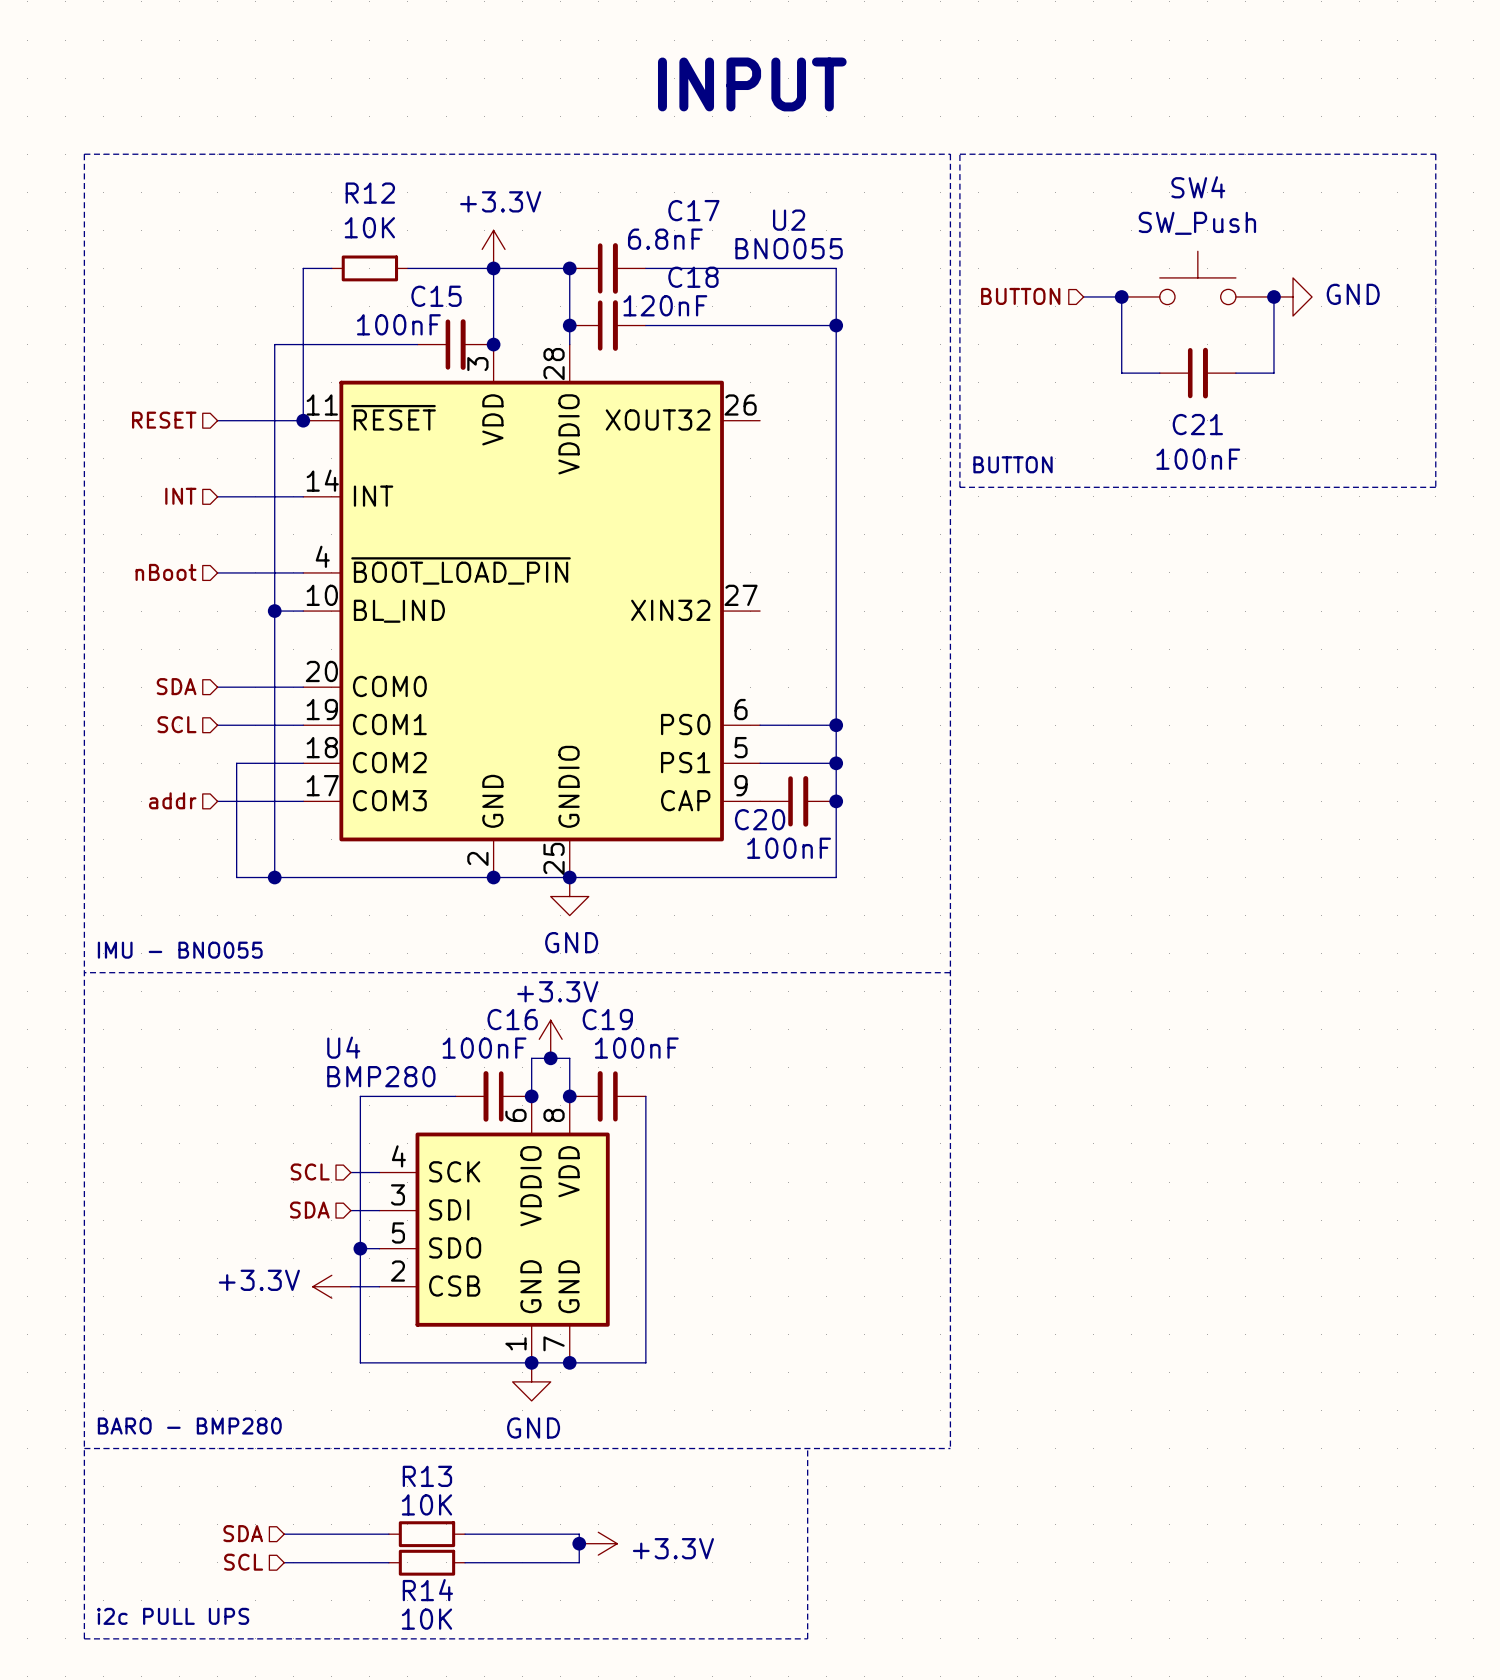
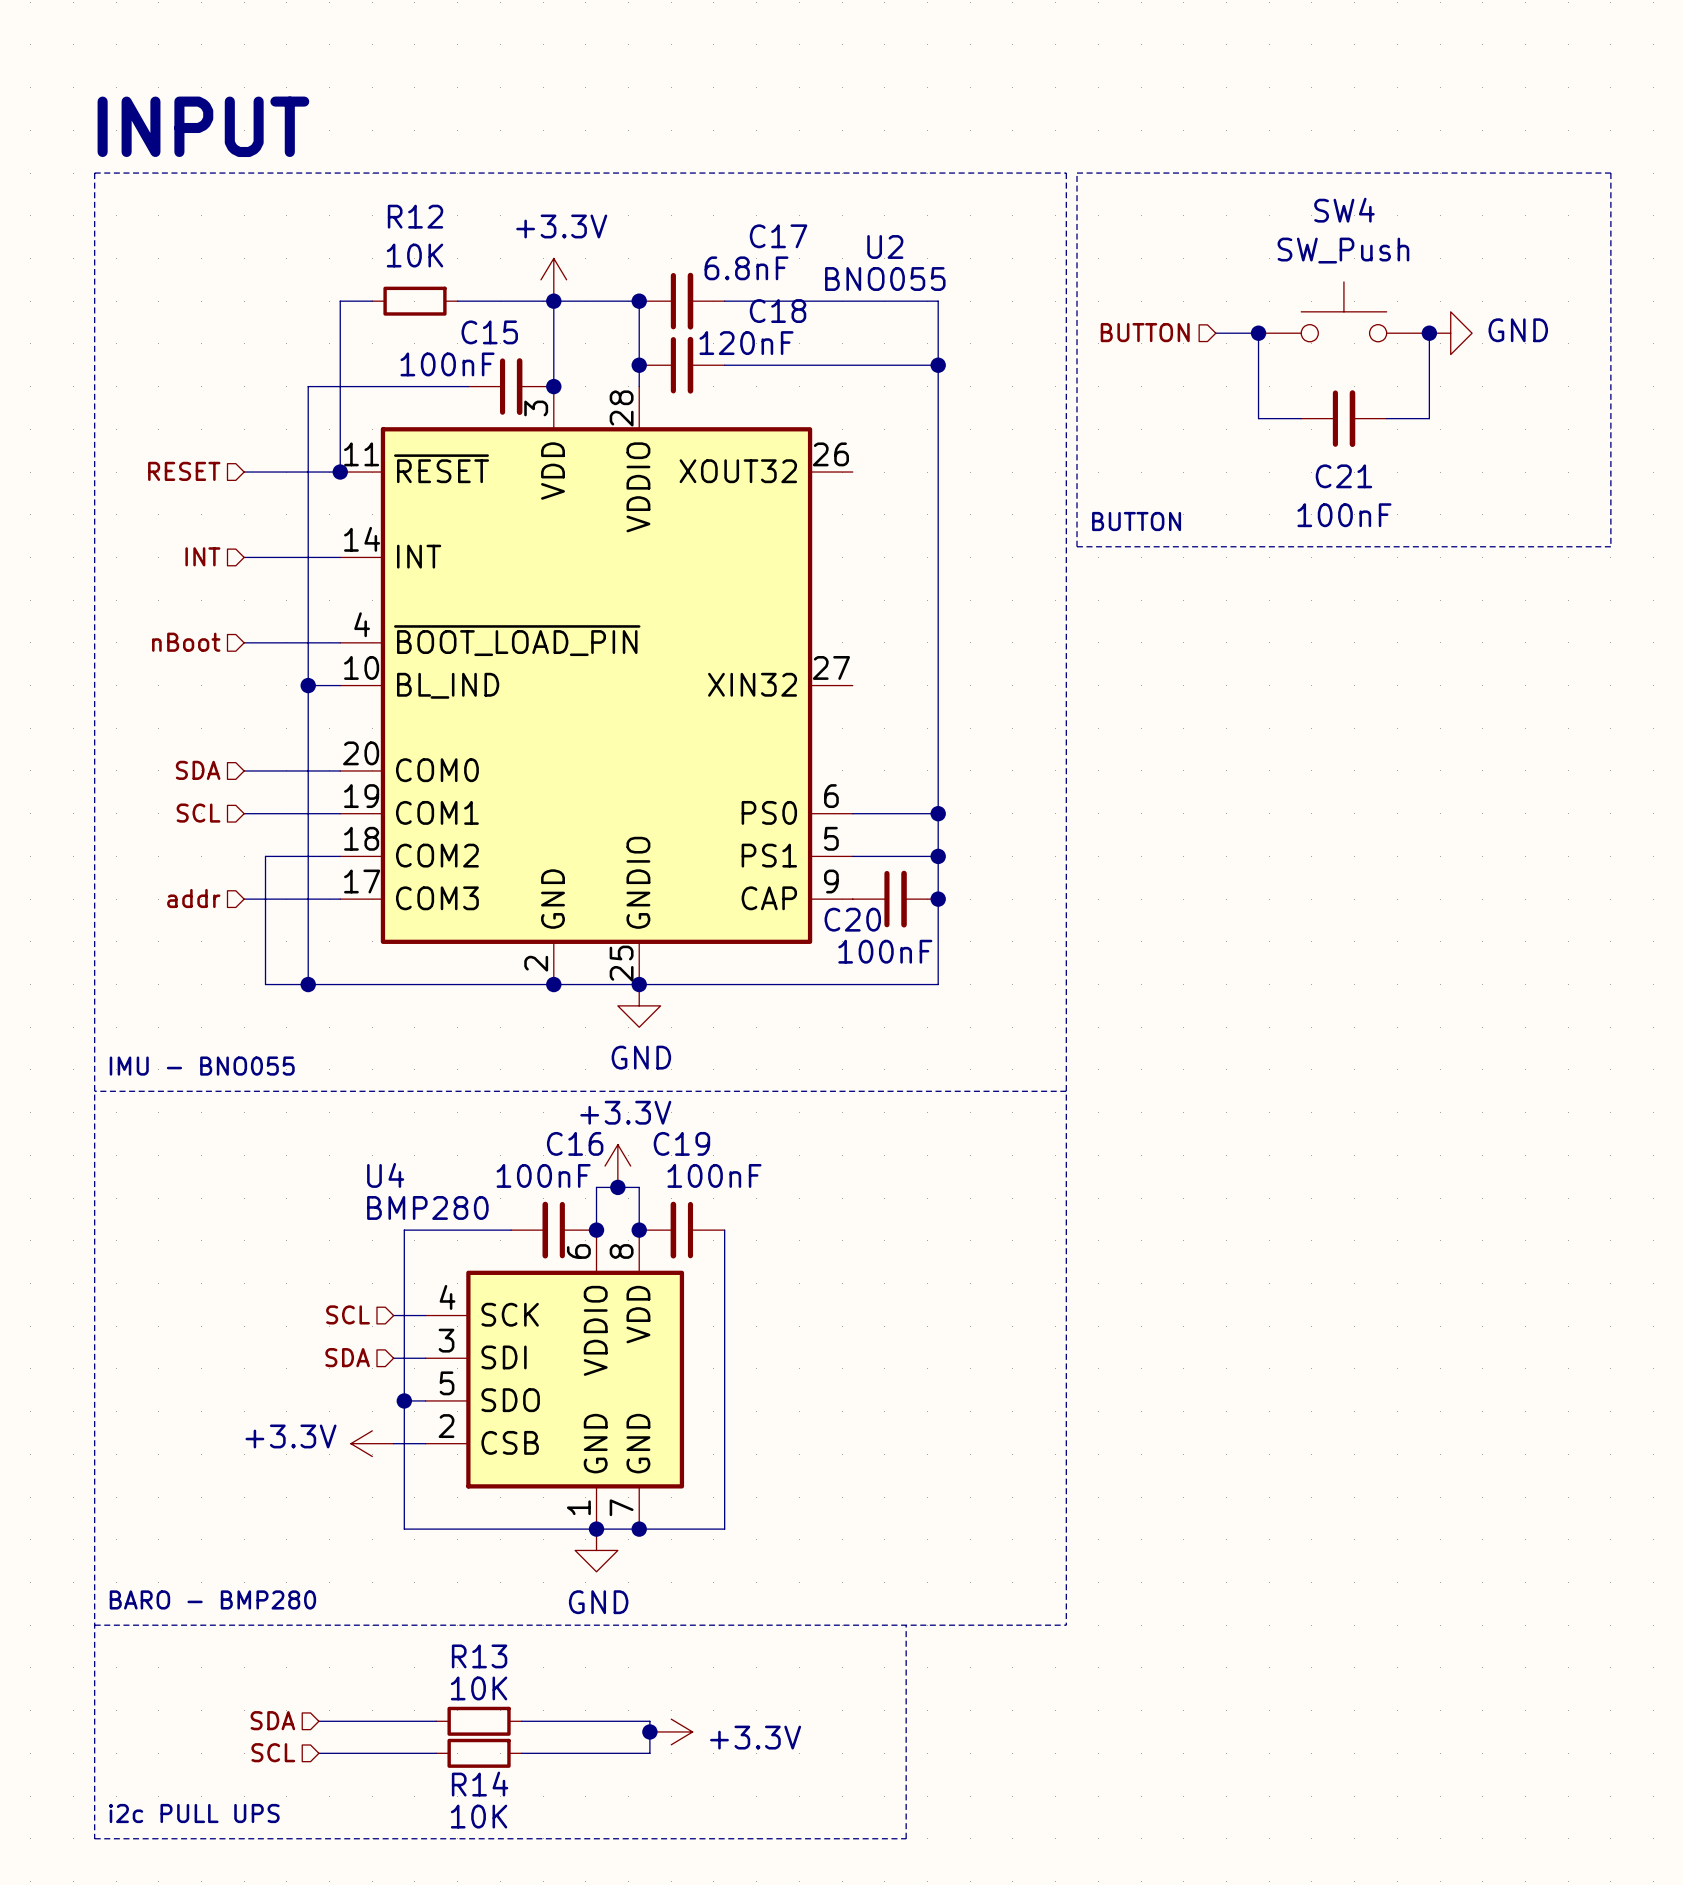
text: INPUT (752, 84) -> none
text: none -> INPUT (203, 126)

